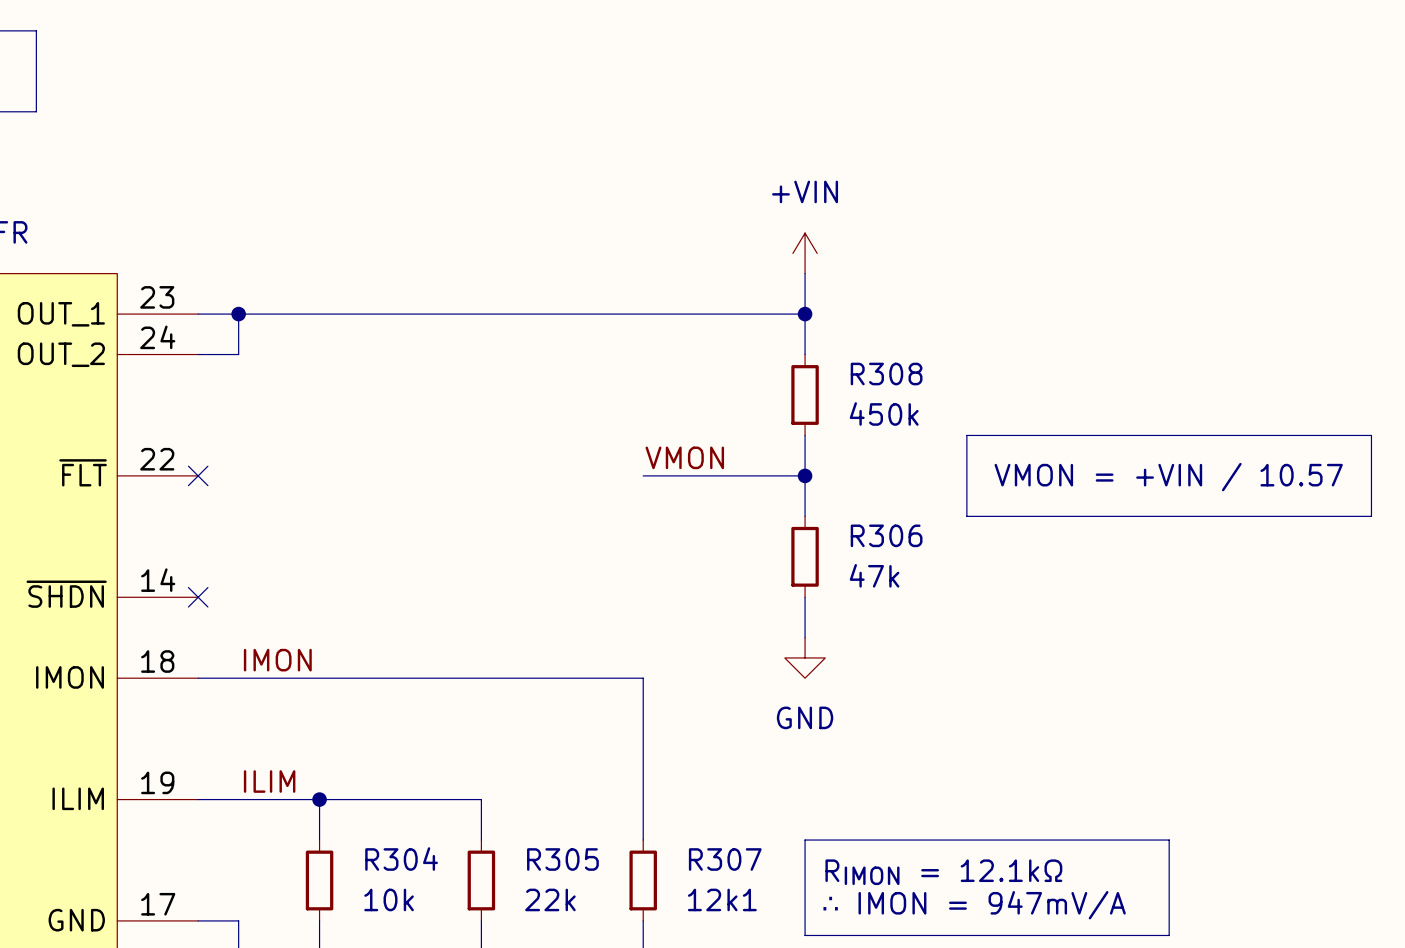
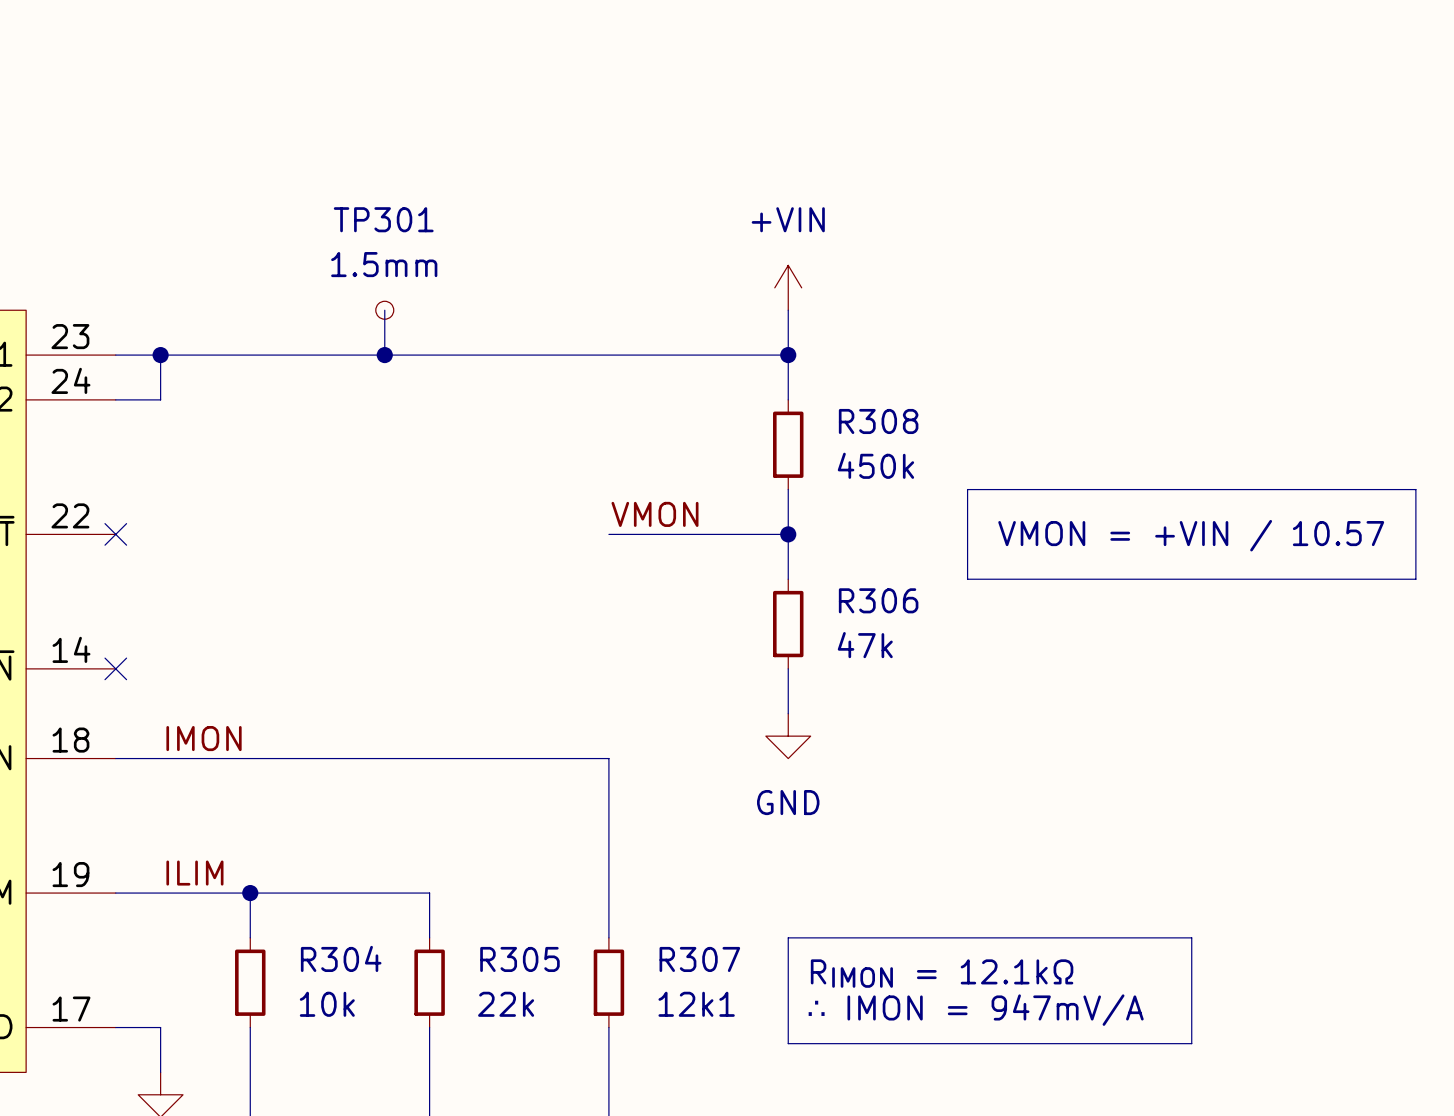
wire: none -> (384, 310) (384, 355)
TP301: none -> 1.5mm (384, 310)
junction: none -> (384, 355)

